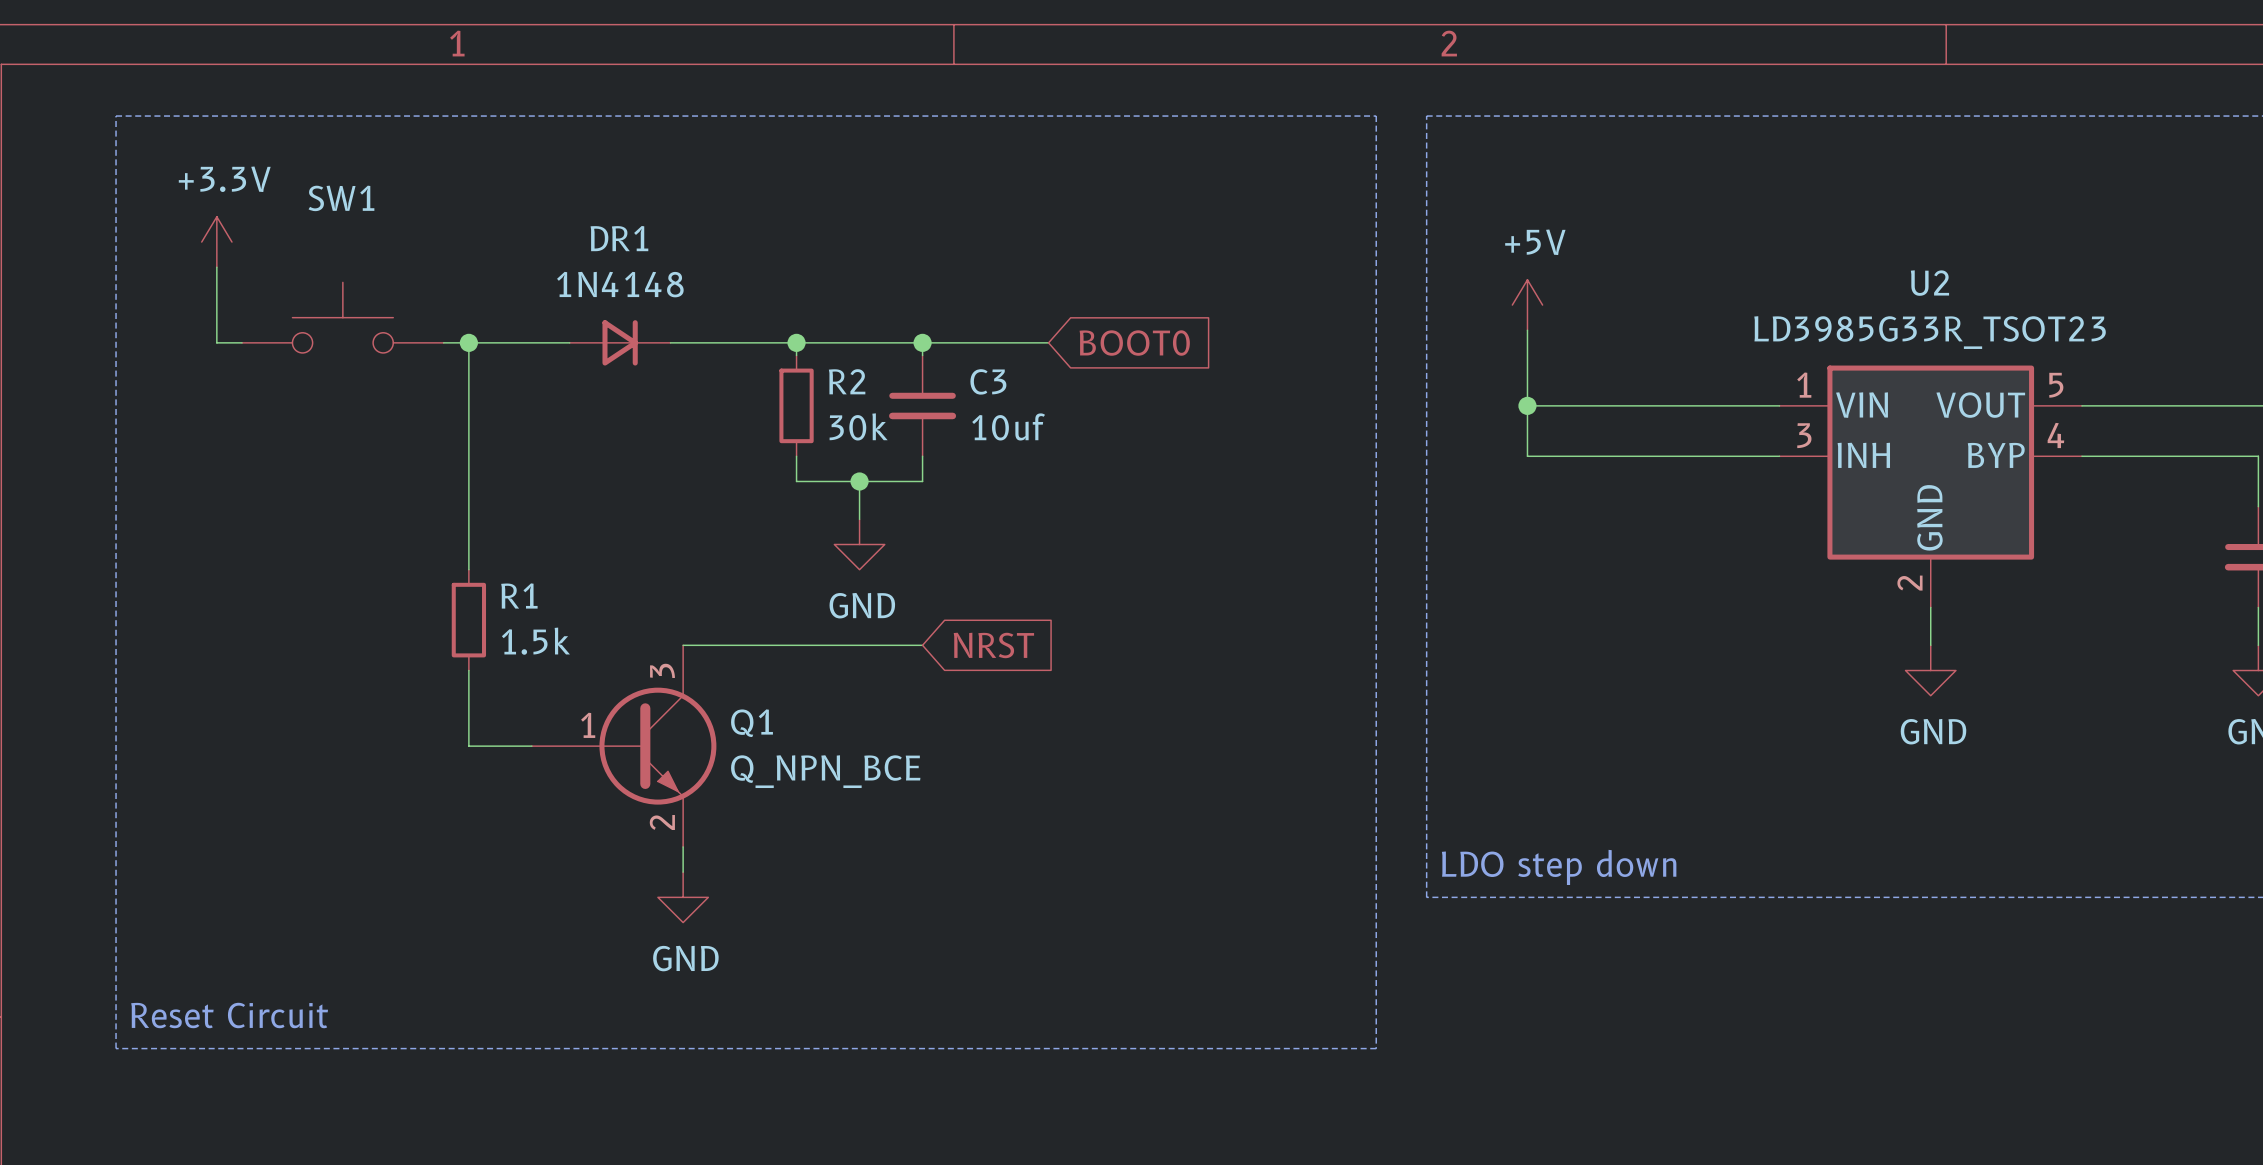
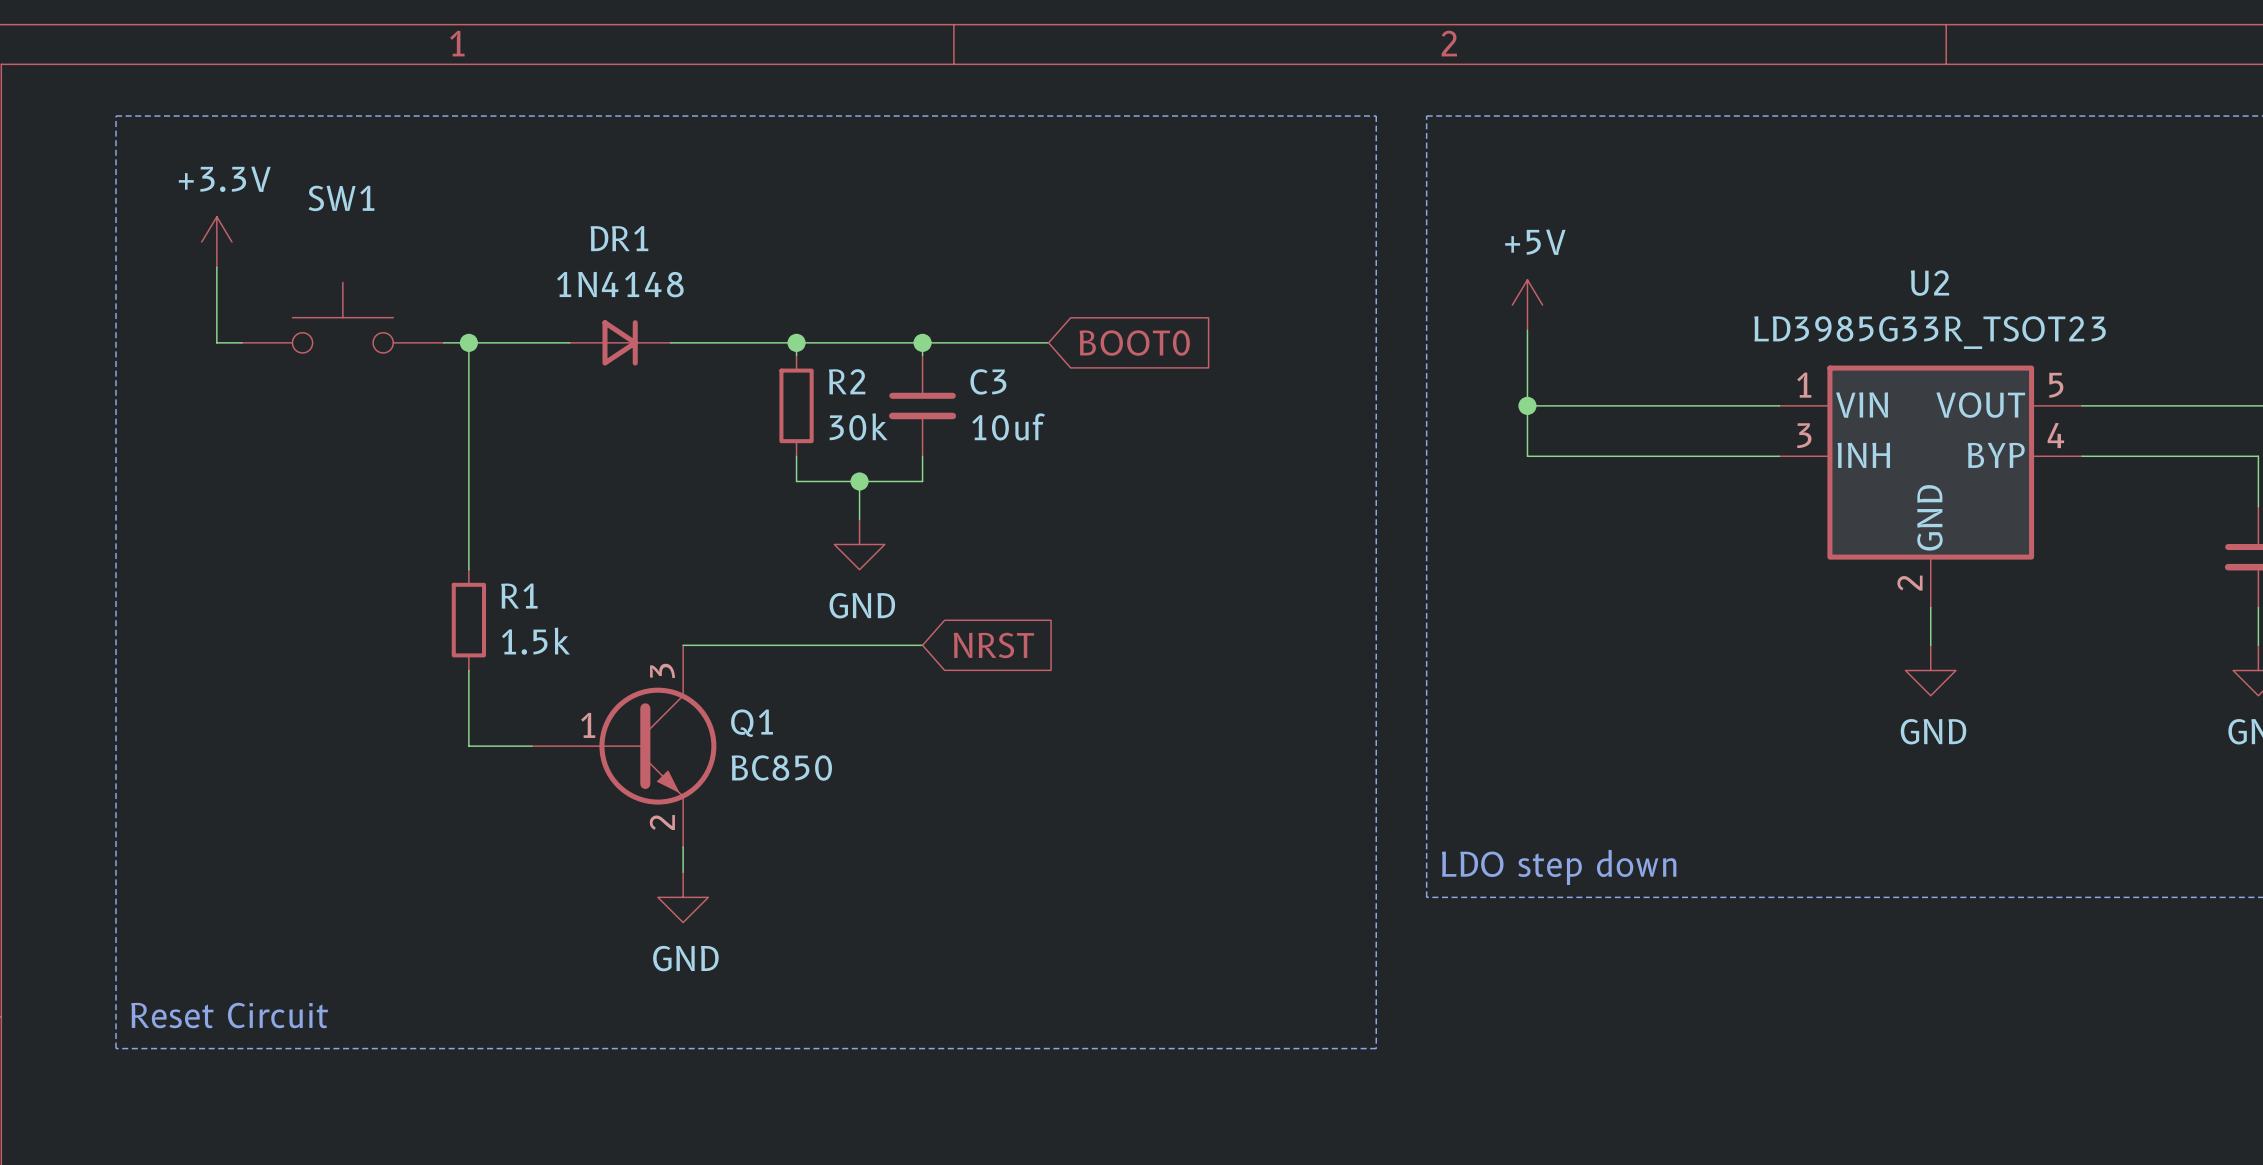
Q1 value: Q_NPN_BCE (825, 771) -> BC850 (781, 768)

